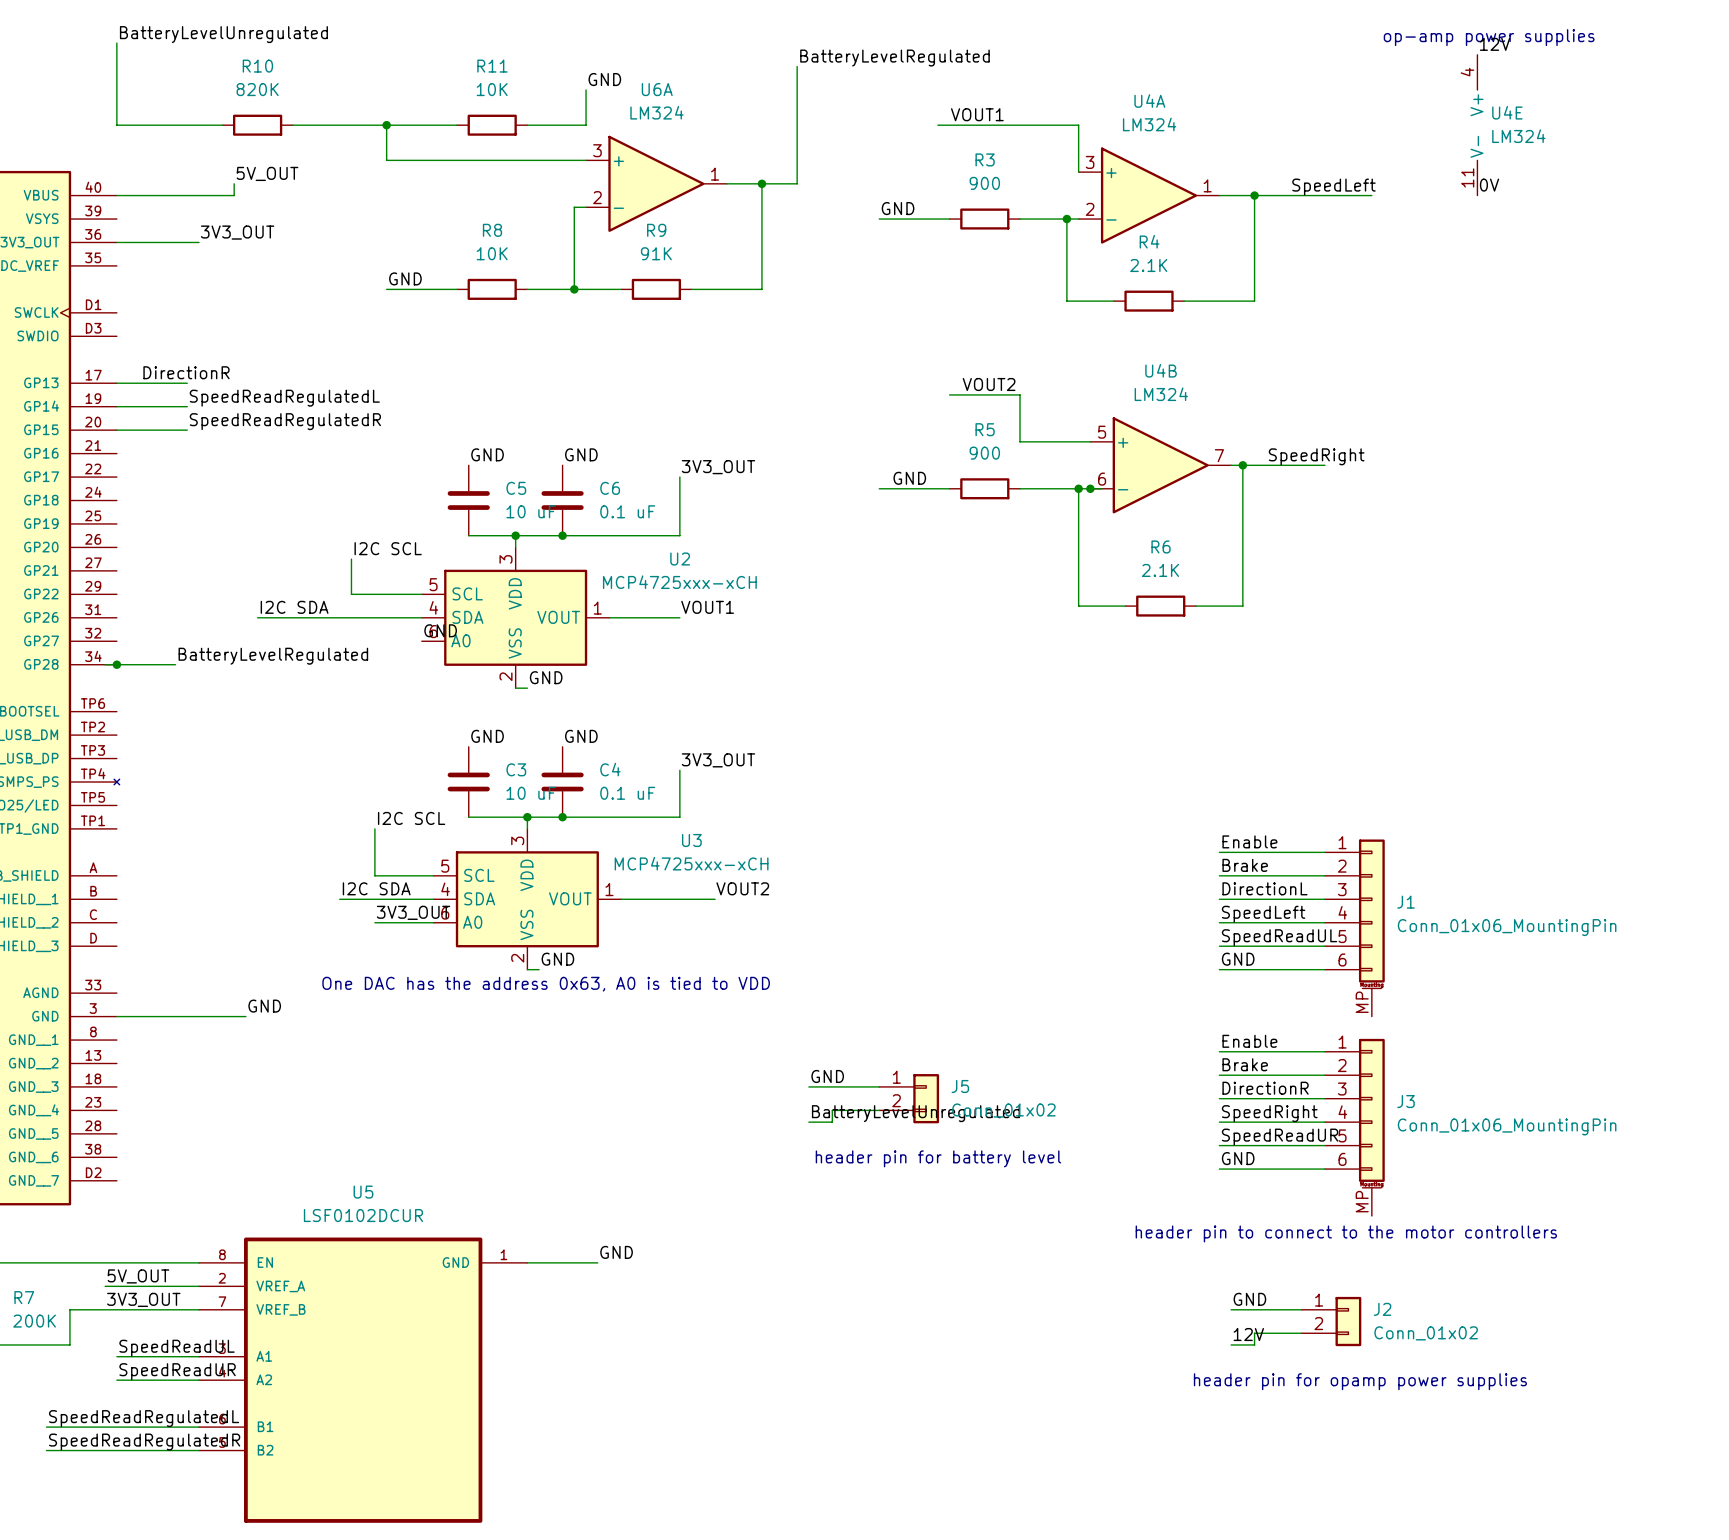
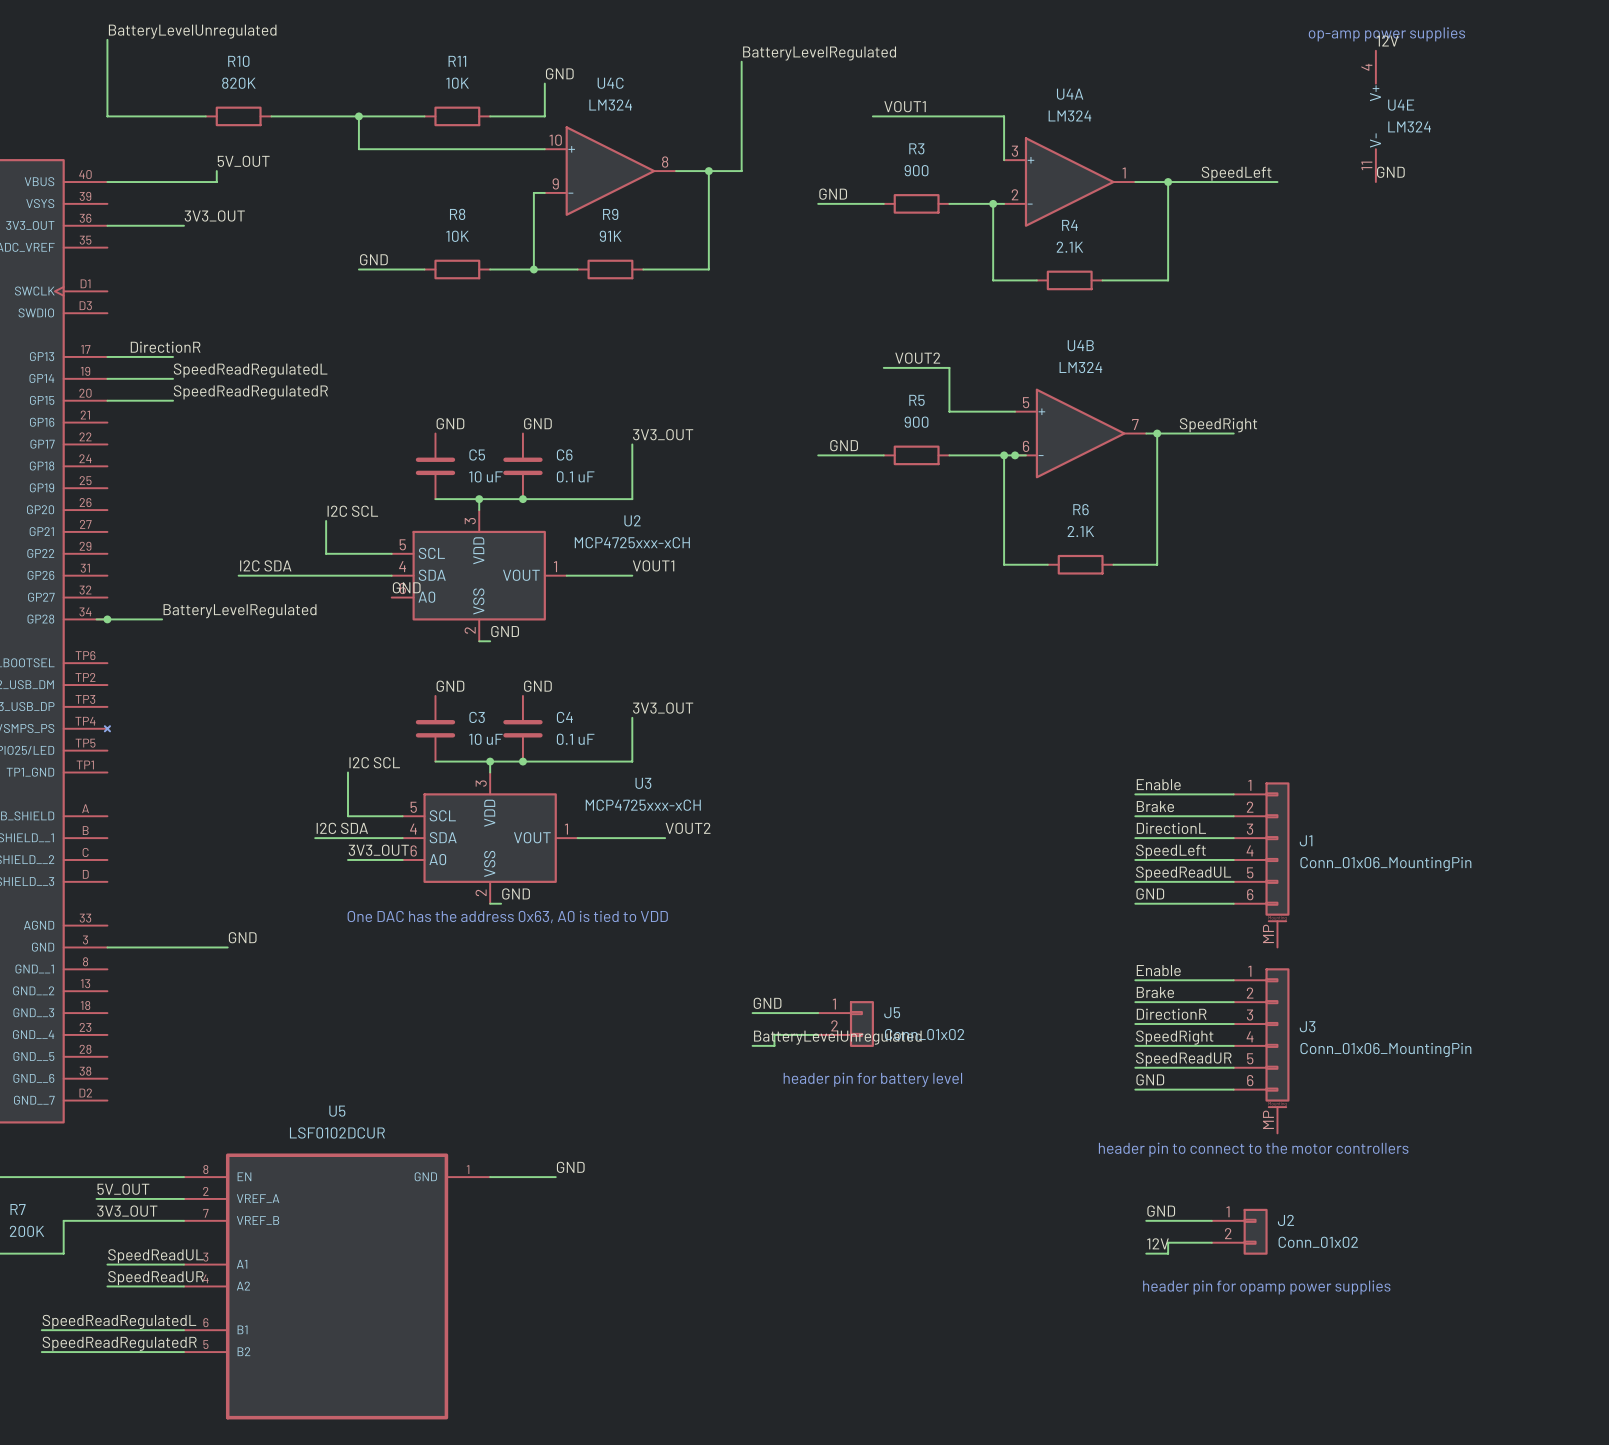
U6A name: U6A (657, 89) -> U4C (610, 83)
U6A pin number: 3 (597, 150) -> 10 (555, 140)
U6A pin number: 1 (715, 174) -> 8 (665, 162)
label: 0V (1489, 185) -> GND (1390, 172)
U6A pin number: 2 (597, 197) -> 9 (555, 183)

